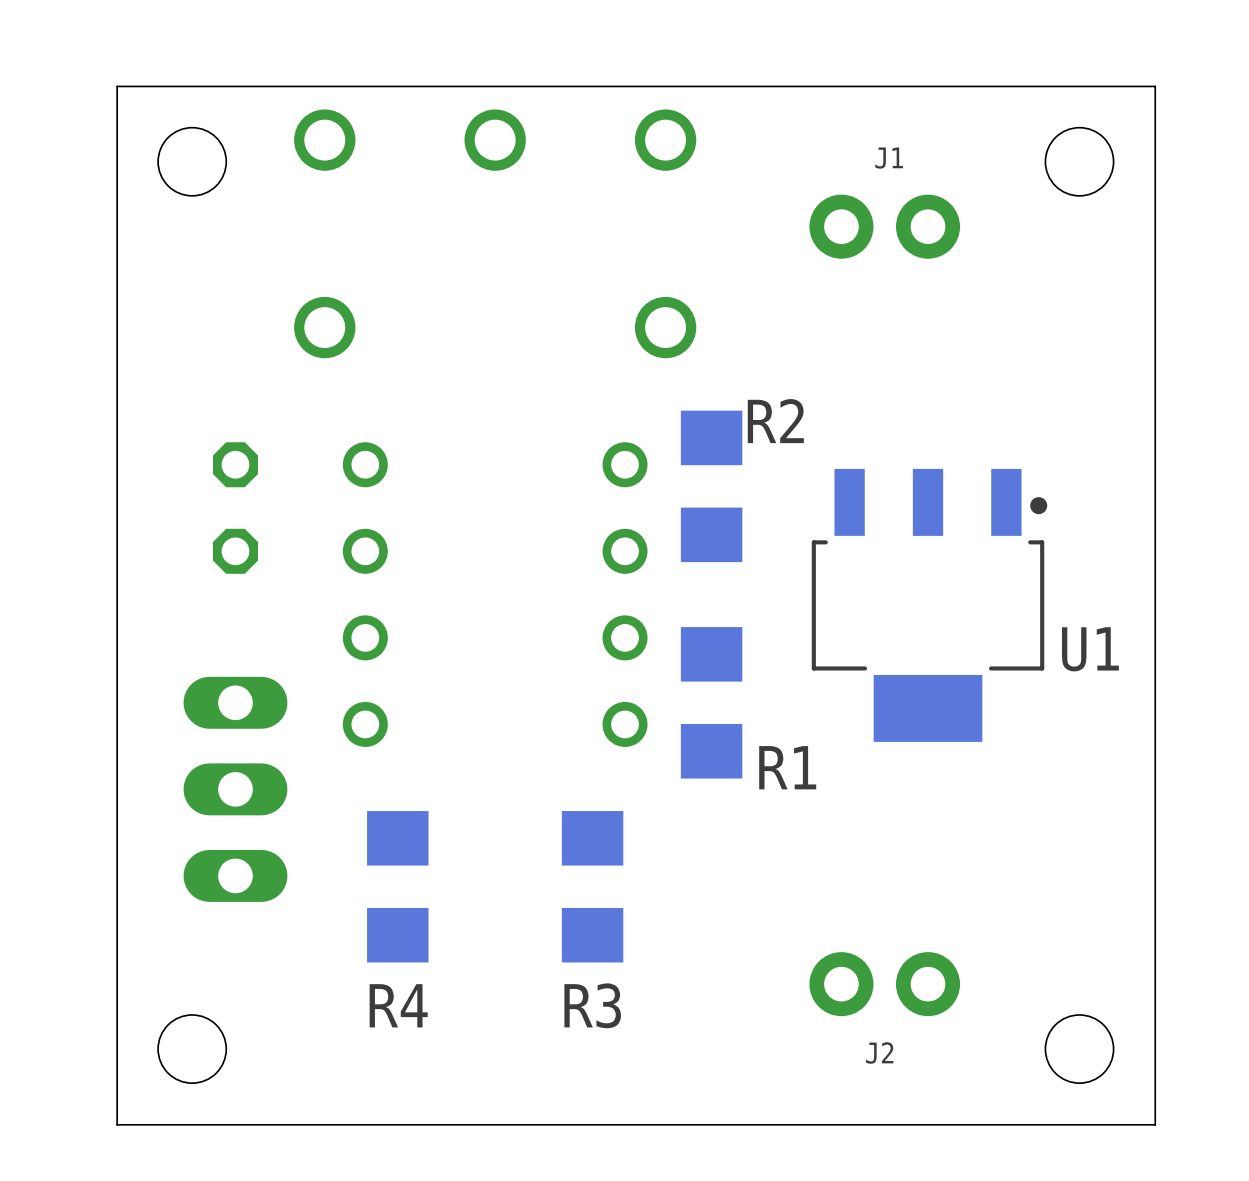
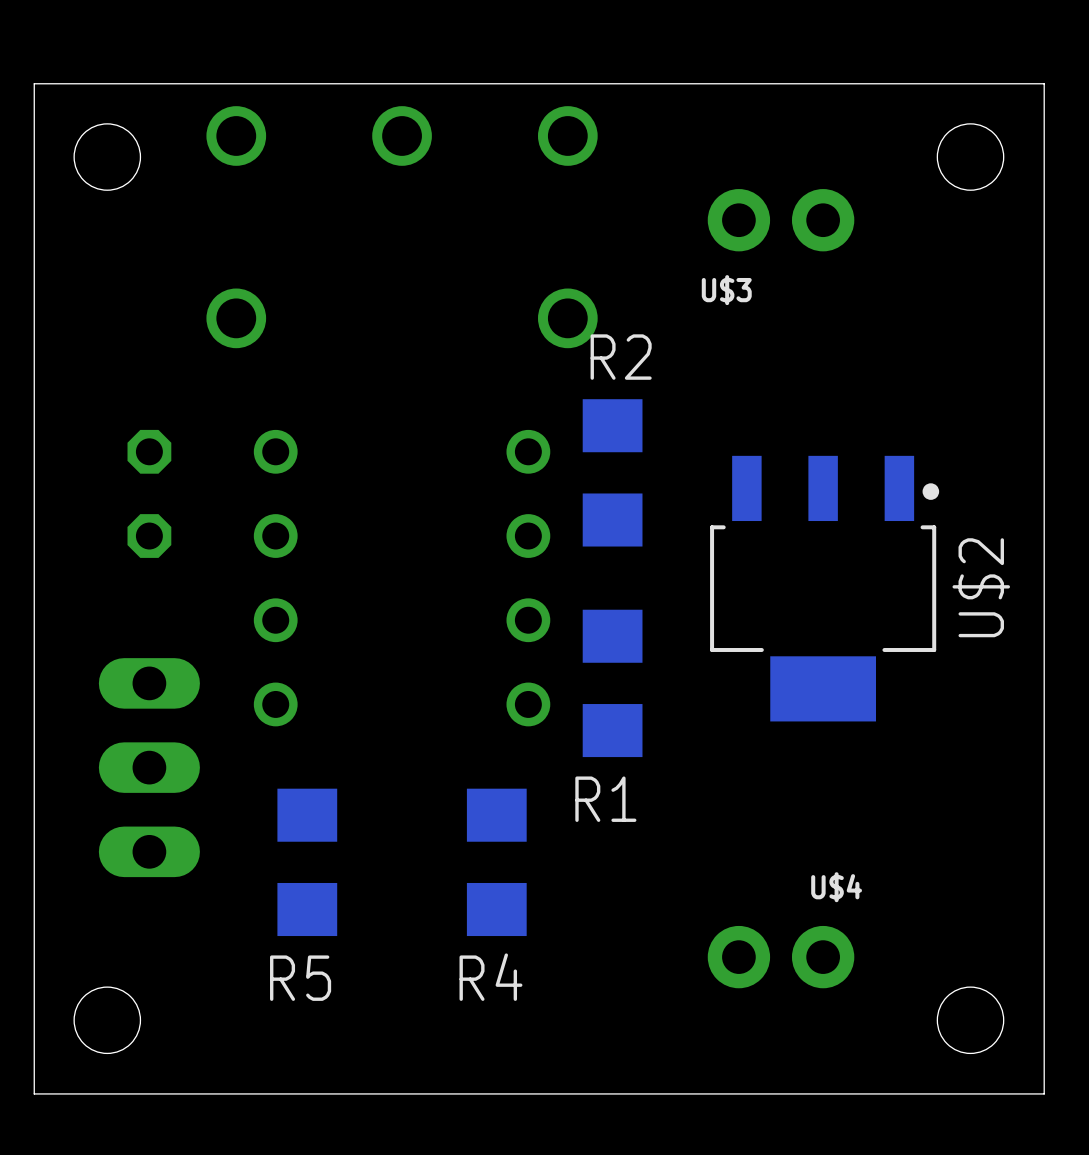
J1 name: J1 (889, 158) -> U$3 (726, 290)
R2 name position: R2 (775, 421) -> R2 (621, 357)
U1 name: U1 (1090, 649) -> U$2 (981, 587)
R1 name position: R1 (787, 767) -> R1 (605, 799)
R4 name: R4 (398, 1005) -> R5 (300, 978)
R3 name: R3 (592, 1005) -> R4 (490, 977)
J2 name: J2 (879, 1052) -> U$4 (836, 887)

